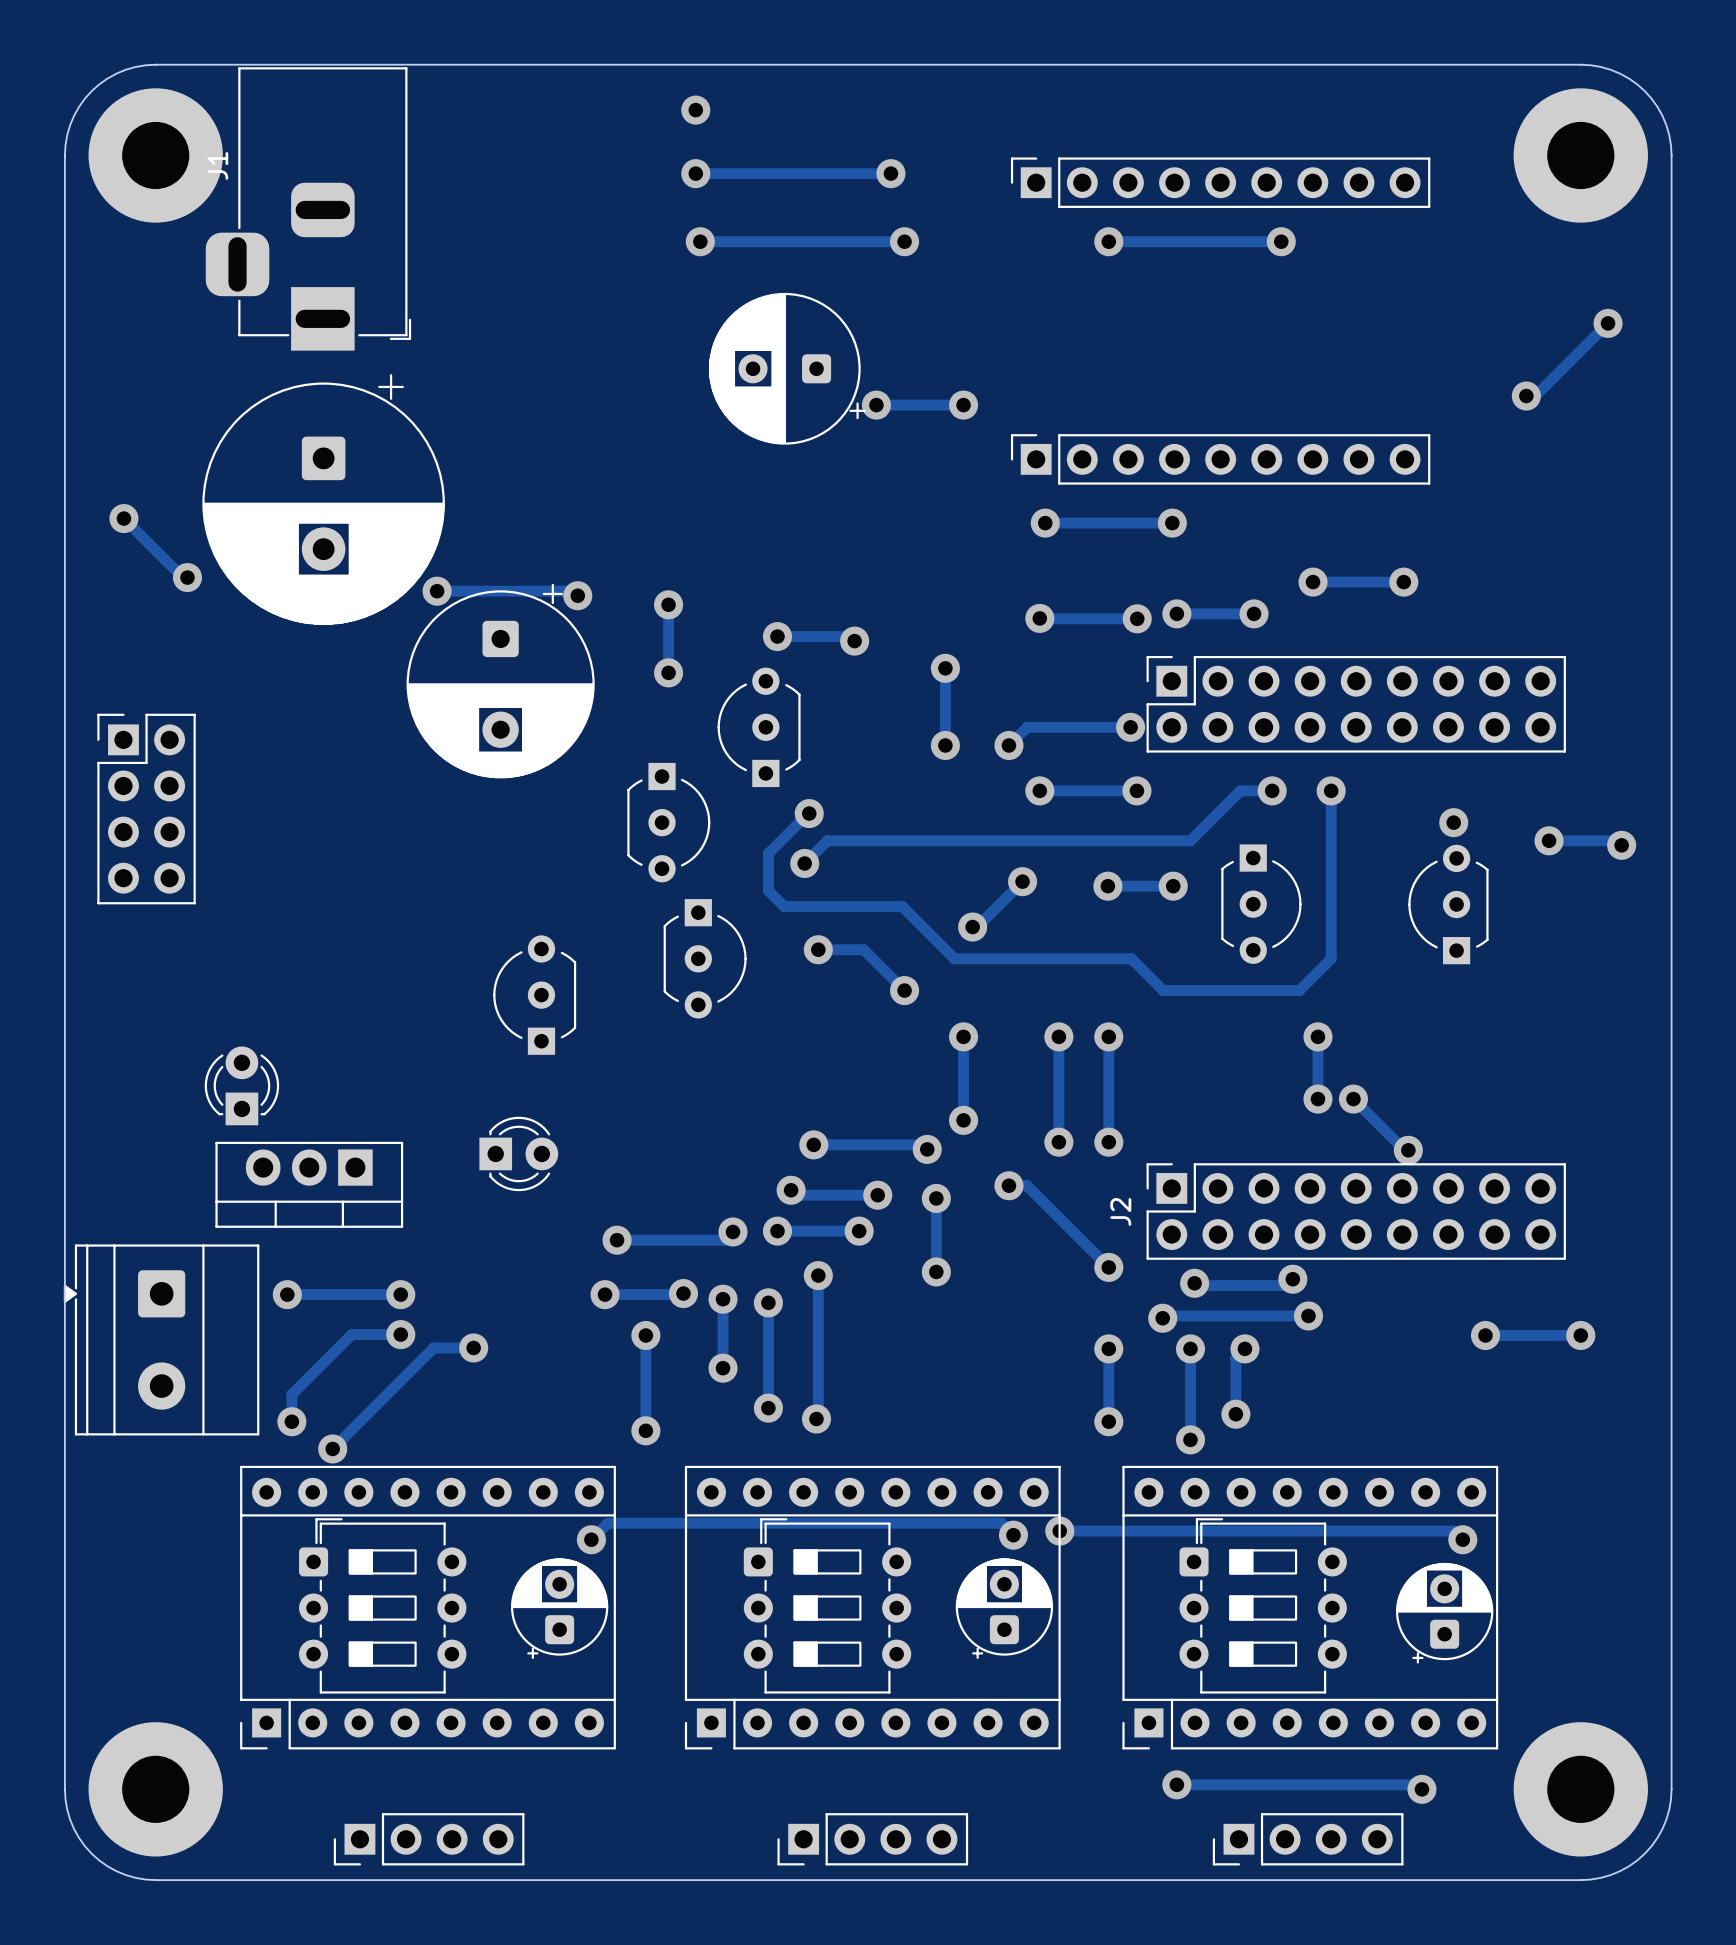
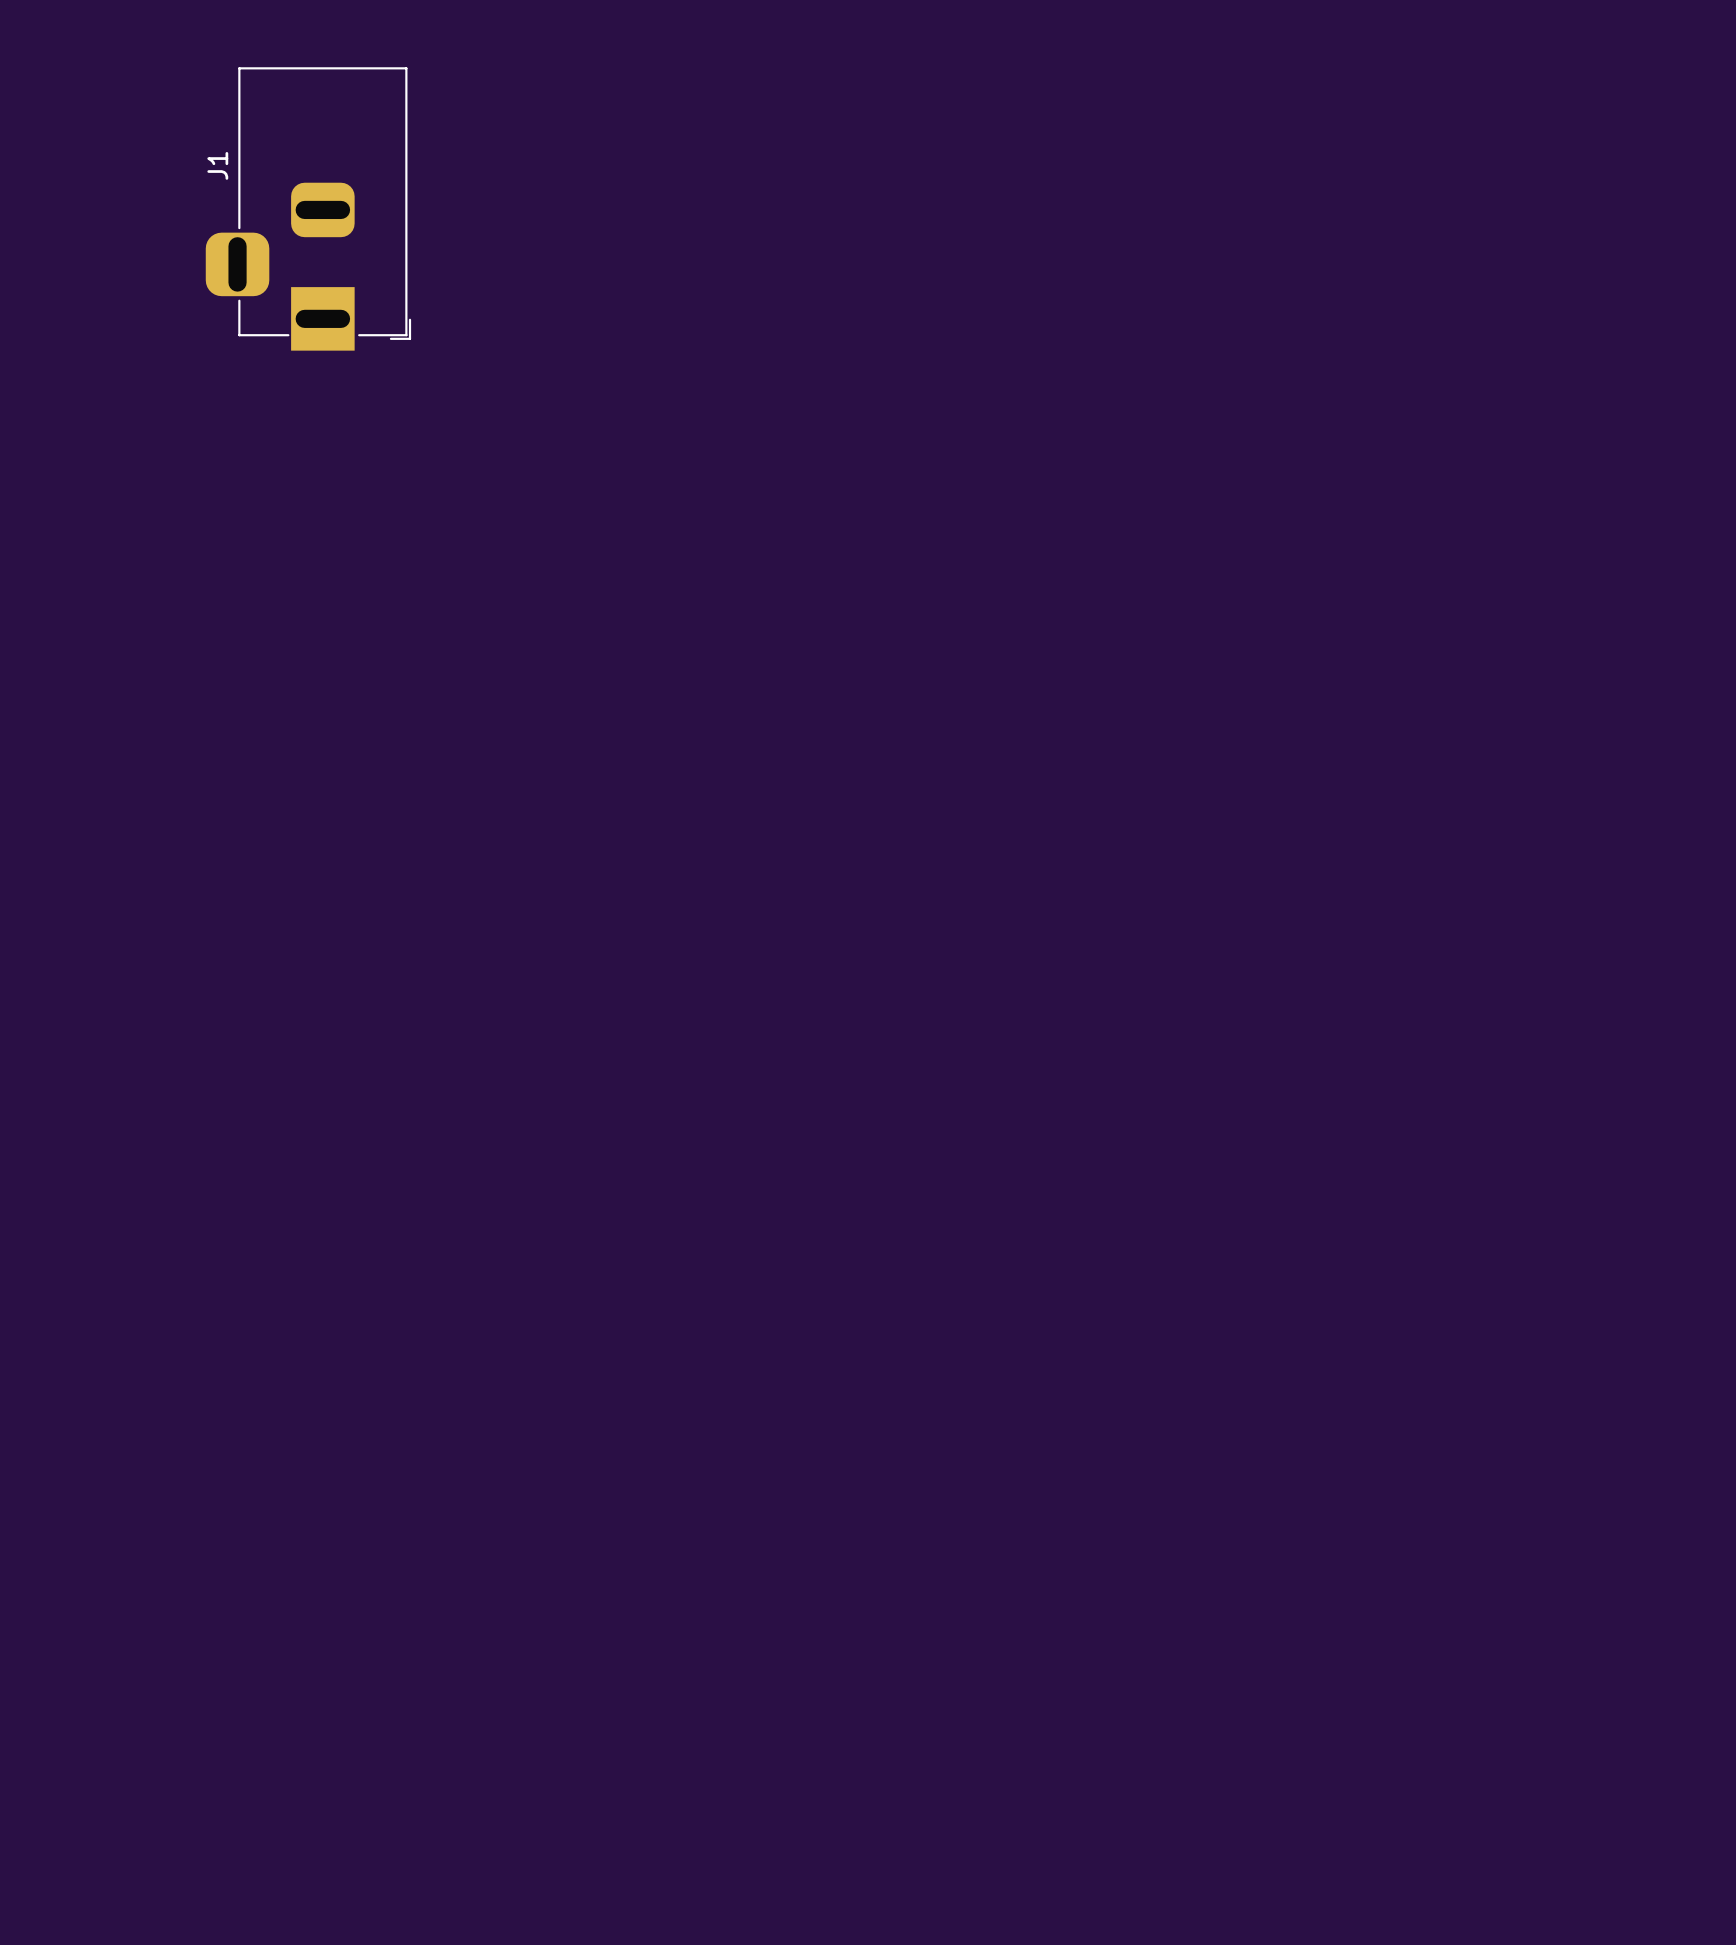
board edge: (155, 64) (1580, 64) (1601, 66) (1620, 73) (1637, 84) (1651, 98) (1666, 125) (1671, 155) (1671, 1789) (1669, 1809) (1662, 1828) (1651, 1845) (1637, 1860) (1610, 1875) (1580, 1880) (155, 1880) (135, 1877) (116, 1871) (99, 1860) (84, 1845) (70, 1819) (64, 1789) (64, 155) (70, 125) (78, 107) (91, 91) (116, 73) (135, 66) (155, 64) -> none
via: (695, 110) -> none
part: (155, 155) -> none
part: (1580, 155) -> none
track: (695, 173) (890, 173) -> none
via: (695, 173) -> none
via: (890, 173) -> none
part: (1220, 182) -> none
track: (700, 241) (904, 241) -> none
via: (700, 241) -> none
via: (904, 241) -> none
track: (1108, 241) (1281, 241) -> none
via: (1108, 241) -> none
via: (1281, 241) -> none
track: (1608, 323) (1535, 396) (1526, 396) -> none
via: (1608, 323) -> none
part: (787, 368) -> none
via: (1526, 396) -> none
track: (876, 405) (963, 405) -> none
via: (876, 405) -> none
via: (963, 405) -> none
part: (1220, 459) -> none
part: (323, 499) -> none
track: (123, 518) (182, 577) (187, 577) -> none
via: (123, 518) -> none
track: (1045, 523) (1172, 523) -> none
via: (1045, 523) -> none
via: (1172, 523) -> none
via: (187, 577) -> none
track: (1313, 582) (1403, 582) -> none
via: (1313, 582) -> none
via: (1403, 582) -> none
track: (437, 591) (573, 591) (577, 595) -> none
via: (437, 591) -> none
via: (577, 595) -> none
track: (668, 604) (668, 672) -> none
via: (668, 604) -> none
track: (1176, 613) (1254, 613) -> none
via: (1176, 613) -> none
via: (1254, 613) -> none
track: (1039, 618) (1137, 618) -> none
via: (1039, 618) -> none
via: (1137, 618) -> none
track: (777, 636) (850, 636) (854, 641) -> none
via: (777, 636) -> none
via: (854, 641) -> none
track: (945, 668) (945, 745) -> none
via: (945, 668) -> none
via: (668, 672) -> none
part: (500, 681) -> none
part: (1356, 704) -> none
part: (759, 727) -> none
track: (1130, 727) (1027, 727) (1008, 745) -> none
via: (1130, 727) -> none
via: (945, 745) -> none
via: (1008, 745) -> none
track: (1039, 790) (1136, 790) -> none
via: (1039, 790) -> none
via: (1136, 790) -> none
track: (1272, 790) (1240, 790) (1190, 840) (827, 840) (804, 863) -> none
via: (1272, 790) -> none
track: (1331, 790) (1331, 958) (1299, 990) (1163, 990) (1131, 958) (954, 958) (902, 906) (784, 906) (768, 890) (768, 853) (809, 813) -> none
via: (1331, 790) -> none
part: (146, 809) -> none
via: (809, 813) -> none
part: (668, 822) -> none
via: (1453, 822) -> none
track: (1549, 840) (1617, 840) (1621, 845) -> none
via: (1549, 840) -> none
via: (1621, 845) -> none
via: (804, 863) -> none
track: (1022, 881) (977, 927) (972, 927) -> none
via: (1022, 881) -> none
track: (1107, 886) (1173, 886) -> none
via: (1107, 886) -> none
via: (1173, 886) -> none
part: (1261, 904) -> none
part: (1448, 904) -> none
via: (972, 927) -> none
track: (818, 949) (863, 949) (904, 990) -> none
via: (818, 949) -> none
part: (705, 958) -> none
via: (904, 990) -> none
part: (534, 995) -> none
track: (963, 1036) (963, 1120) -> none
via: (963, 1036) -> none
track: (1058, 1036) (1058, 1142) -> none
via: (1058, 1036) -> none
track: (1108, 1036) (1108, 1142) -> none
via: (1108, 1036) -> none
track: (1317, 1036) (1317, 1099) -> none
via: (1317, 1036) -> none
part: (241, 1085) -> none
via: (1317, 1099) -> none
track: (1353, 1099) (1404, 1150) (1408, 1150) -> none
via: (1353, 1099) -> none
via: (963, 1120) -> none
via: (1058, 1142) -> none
via: (1108, 1142) -> none
track: (813, 1144) (922, 1144) (927, 1149) -> none
via: (813, 1144) -> none
via: (927, 1149) -> none
via: (1408, 1150) -> none
part: (518, 1153) -> none
part: (309, 1184) -> none
track: (1008, 1185) (1027, 1185) (1108, 1267) -> none
via: (1008, 1185) -> none
track: (791, 1190) (796, 1195) (877, 1195) -> none
via: (791, 1190) -> none
via: (877, 1195) -> none
track: (936, 1198) (936, 1271) -> none
via: (936, 1198) -> none
J2: (1356, 1211) -> none
track: (732, 1231) (724, 1240) (617, 1240) -> none
via: (732, 1231) -> none
track: (777, 1231) (859, 1231) -> none
via: (777, 1231) -> none
via: (859, 1231) -> none
via: (617, 1240) -> none
via: (1108, 1267) -> none
via: (936, 1271) -> none
track: (818, 1275) (818, 1417) (816, 1419) -> none
via: (818, 1275) -> none
track: (1292, 1279) (1289, 1285) (1196, 1285) (1194, 1283) -> none
via: (1292, 1279) -> none
via: (1194, 1283) -> none
track: (683, 1293) (605, 1294) -> none
via: (683, 1293) -> none
track: (287, 1294) (400, 1294) -> none
via: (287, 1294) -> none
via: (400, 1294) -> none
via: (605, 1294) -> none
track: (723, 1299) (723, 1368) -> none
via: (723, 1299) -> none
track: (768, 1302) (768, 1408) -> none
via: (768, 1302) -> none
track: (1308, 1315) (1165, 1315) (1162, 1318) -> none
via: (1308, 1315) -> none
via: (1162, 1318) -> none
track: (400, 1334) (351, 1334) (291, 1394) (291, 1421) -> none
via: (400, 1334) -> none
track: (645, 1335) (645, 1430) -> none
via: (645, 1335) -> none
track: (1485, 1335) (1580, 1335) -> none
via: (1485, 1335) -> none
via: (1580, 1335) -> none
part: (161, 1339) -> none
track: (473, 1347) (433, 1347) (332, 1448) -> none
via: (473, 1347) -> none
track: (1108, 1348) (1108, 1421) -> none
via: (1108, 1348) -> none
track: (1190, 1348) (1190, 1439) -> none
via: (1190, 1348) -> none
track: (1244, 1348) (1235, 1357) (1235, 1414) -> none
via: (1244, 1348) -> none
via: (723, 1368) -> none
via: (768, 1408) -> none
via: (1235, 1414) -> none
via: (816, 1419) -> none
via: (291, 1421) -> none
via: (1108, 1421) -> none
via: (645, 1430) -> none
via: (1190, 1439) -> none
via: (332, 1448) -> none
track: (1059, 1531) (1454, 1531) (1462, 1539) -> none
via: (1059, 1531) -> none
track: (1013, 1535) (1001, 1523) (607, 1523) (591, 1539) -> none
via: (1013, 1535) -> none
via: (591, 1539) -> none
via: (1462, 1539) -> none
part: (382, 1605) -> none
part: (827, 1605) -> none
part: (1263, 1605) -> none
part: (428, 1607) -> none
part: (872, 1607) -> none
part: (1310, 1607) -> none
part: (559, 1608) -> none
part: (1004, 1608) -> none
part: (1444, 1613) -> none
track: (1176, 1784) (1417, 1784) (1421, 1789) -> none
via: (1176, 1784) -> none
part: (155, 1789) -> none
via: (1421, 1789) -> none
part: (1580, 1789) -> none
part: (429, 1839) -> none
part: (872, 1839) -> none
part: (1308, 1839) -> none

